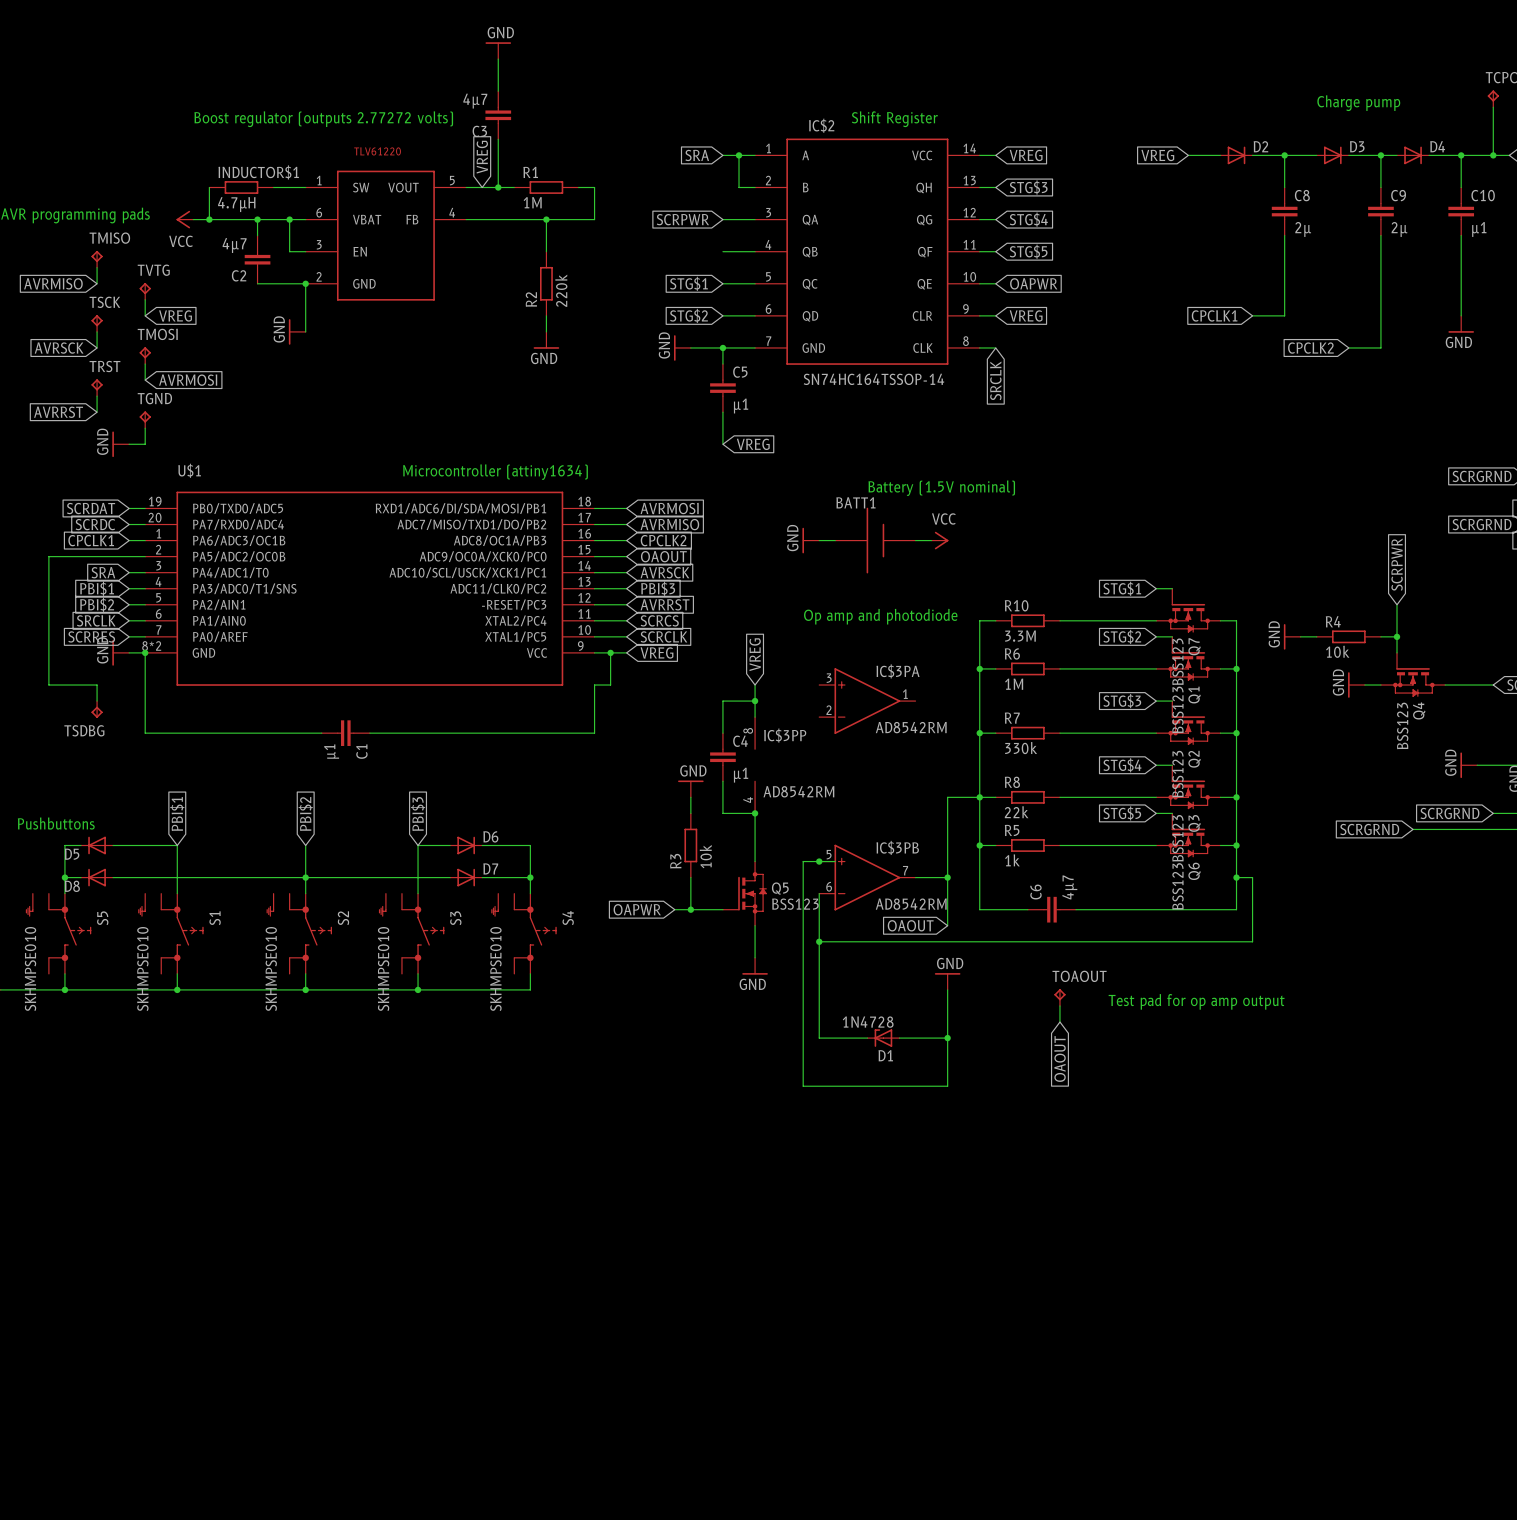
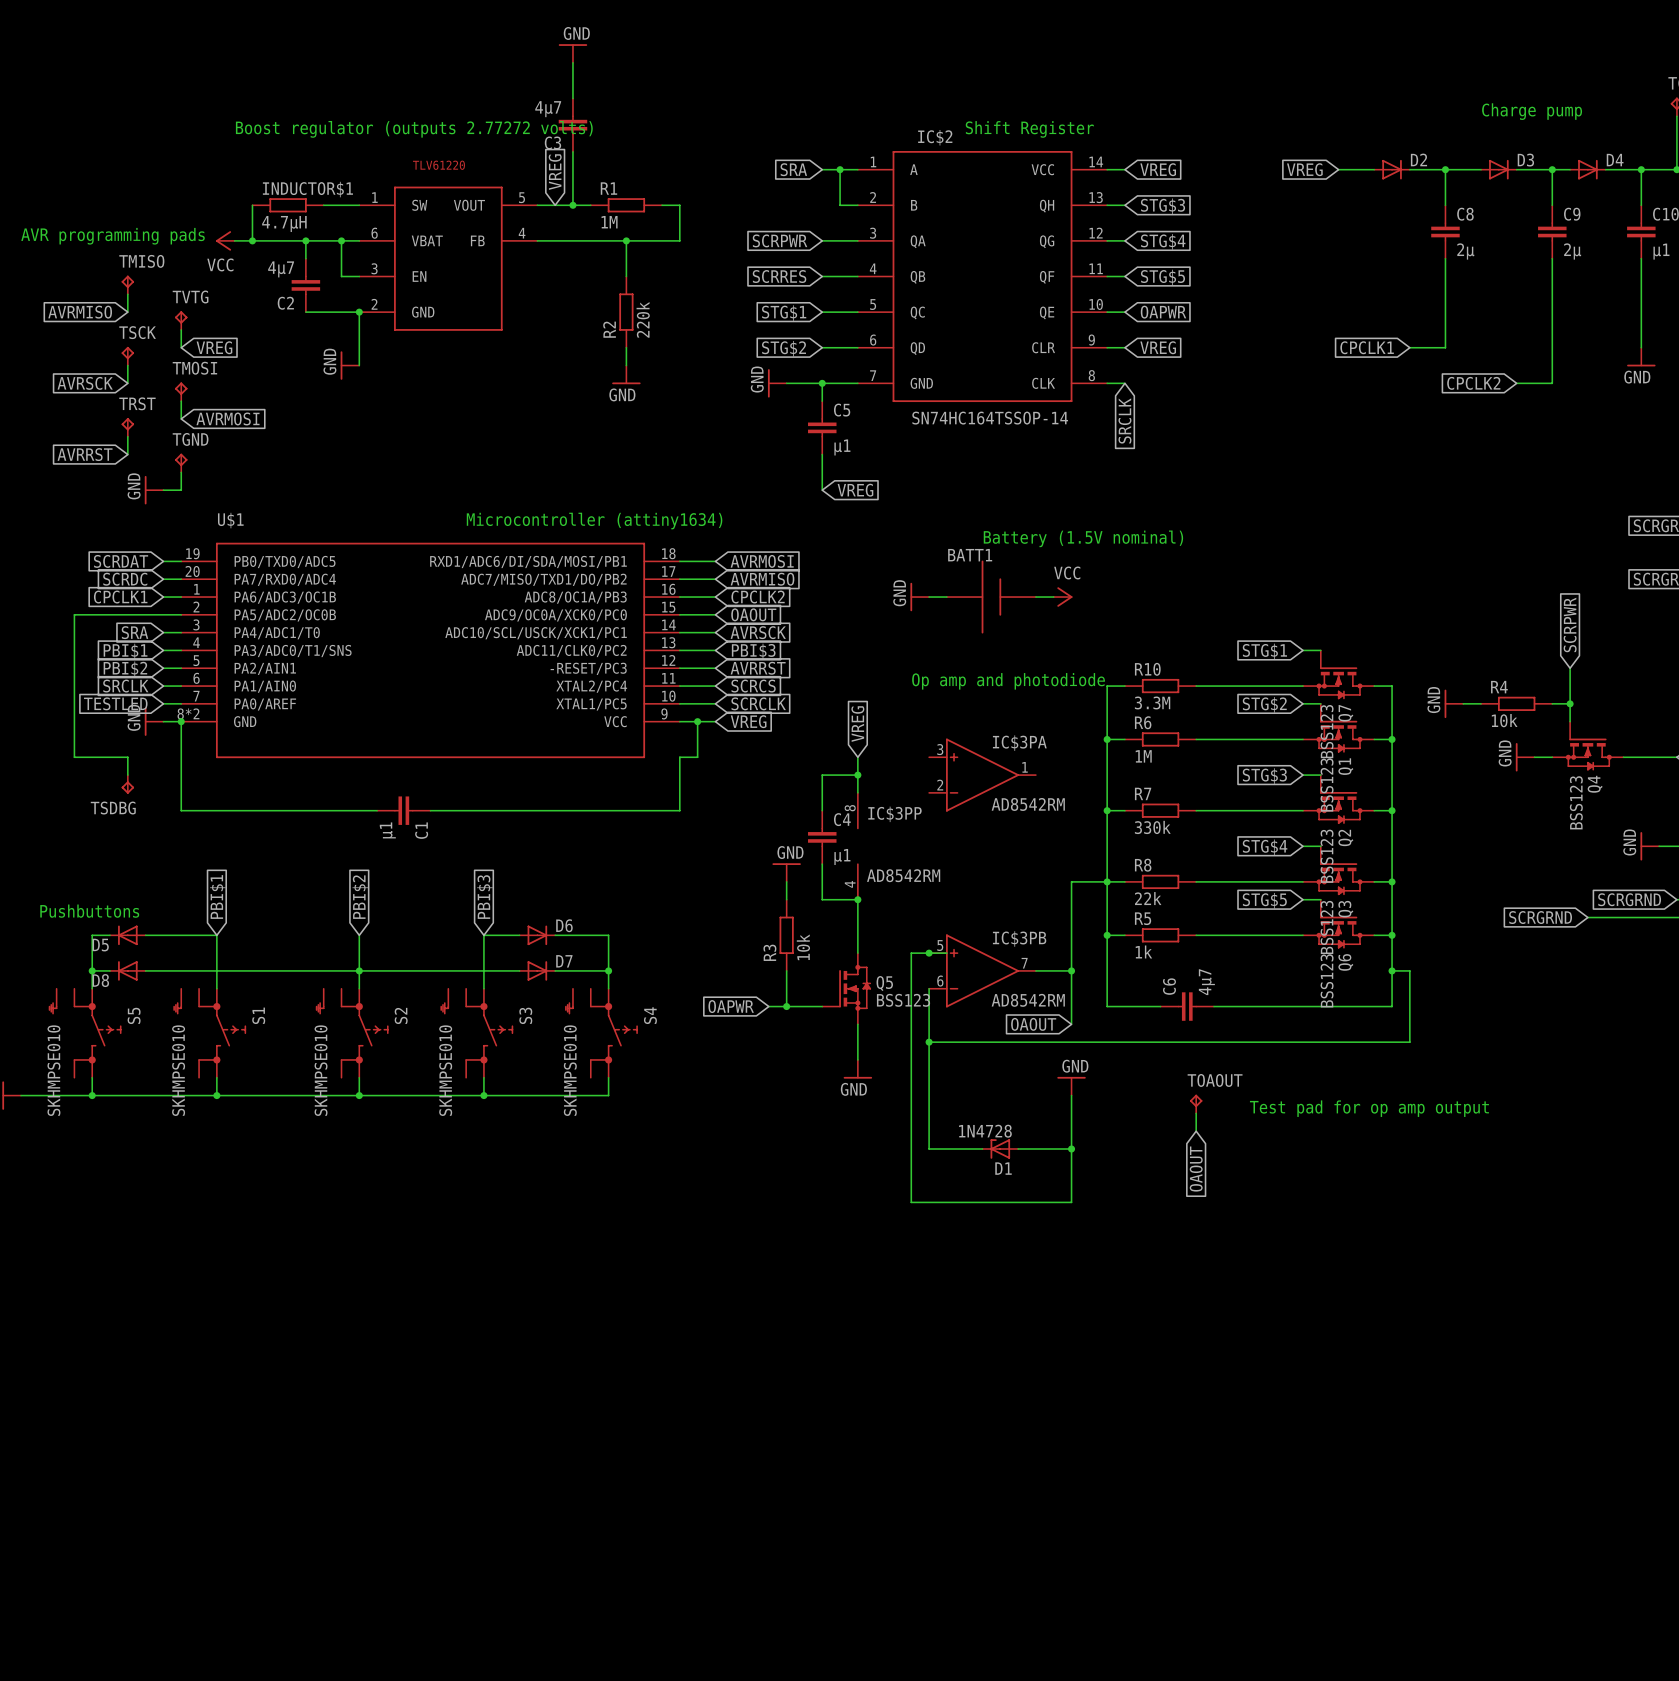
global label: none -> SCRRES (779, 276)
global label: SCRRES (91, 636) -> TESTLED (115, 703)

